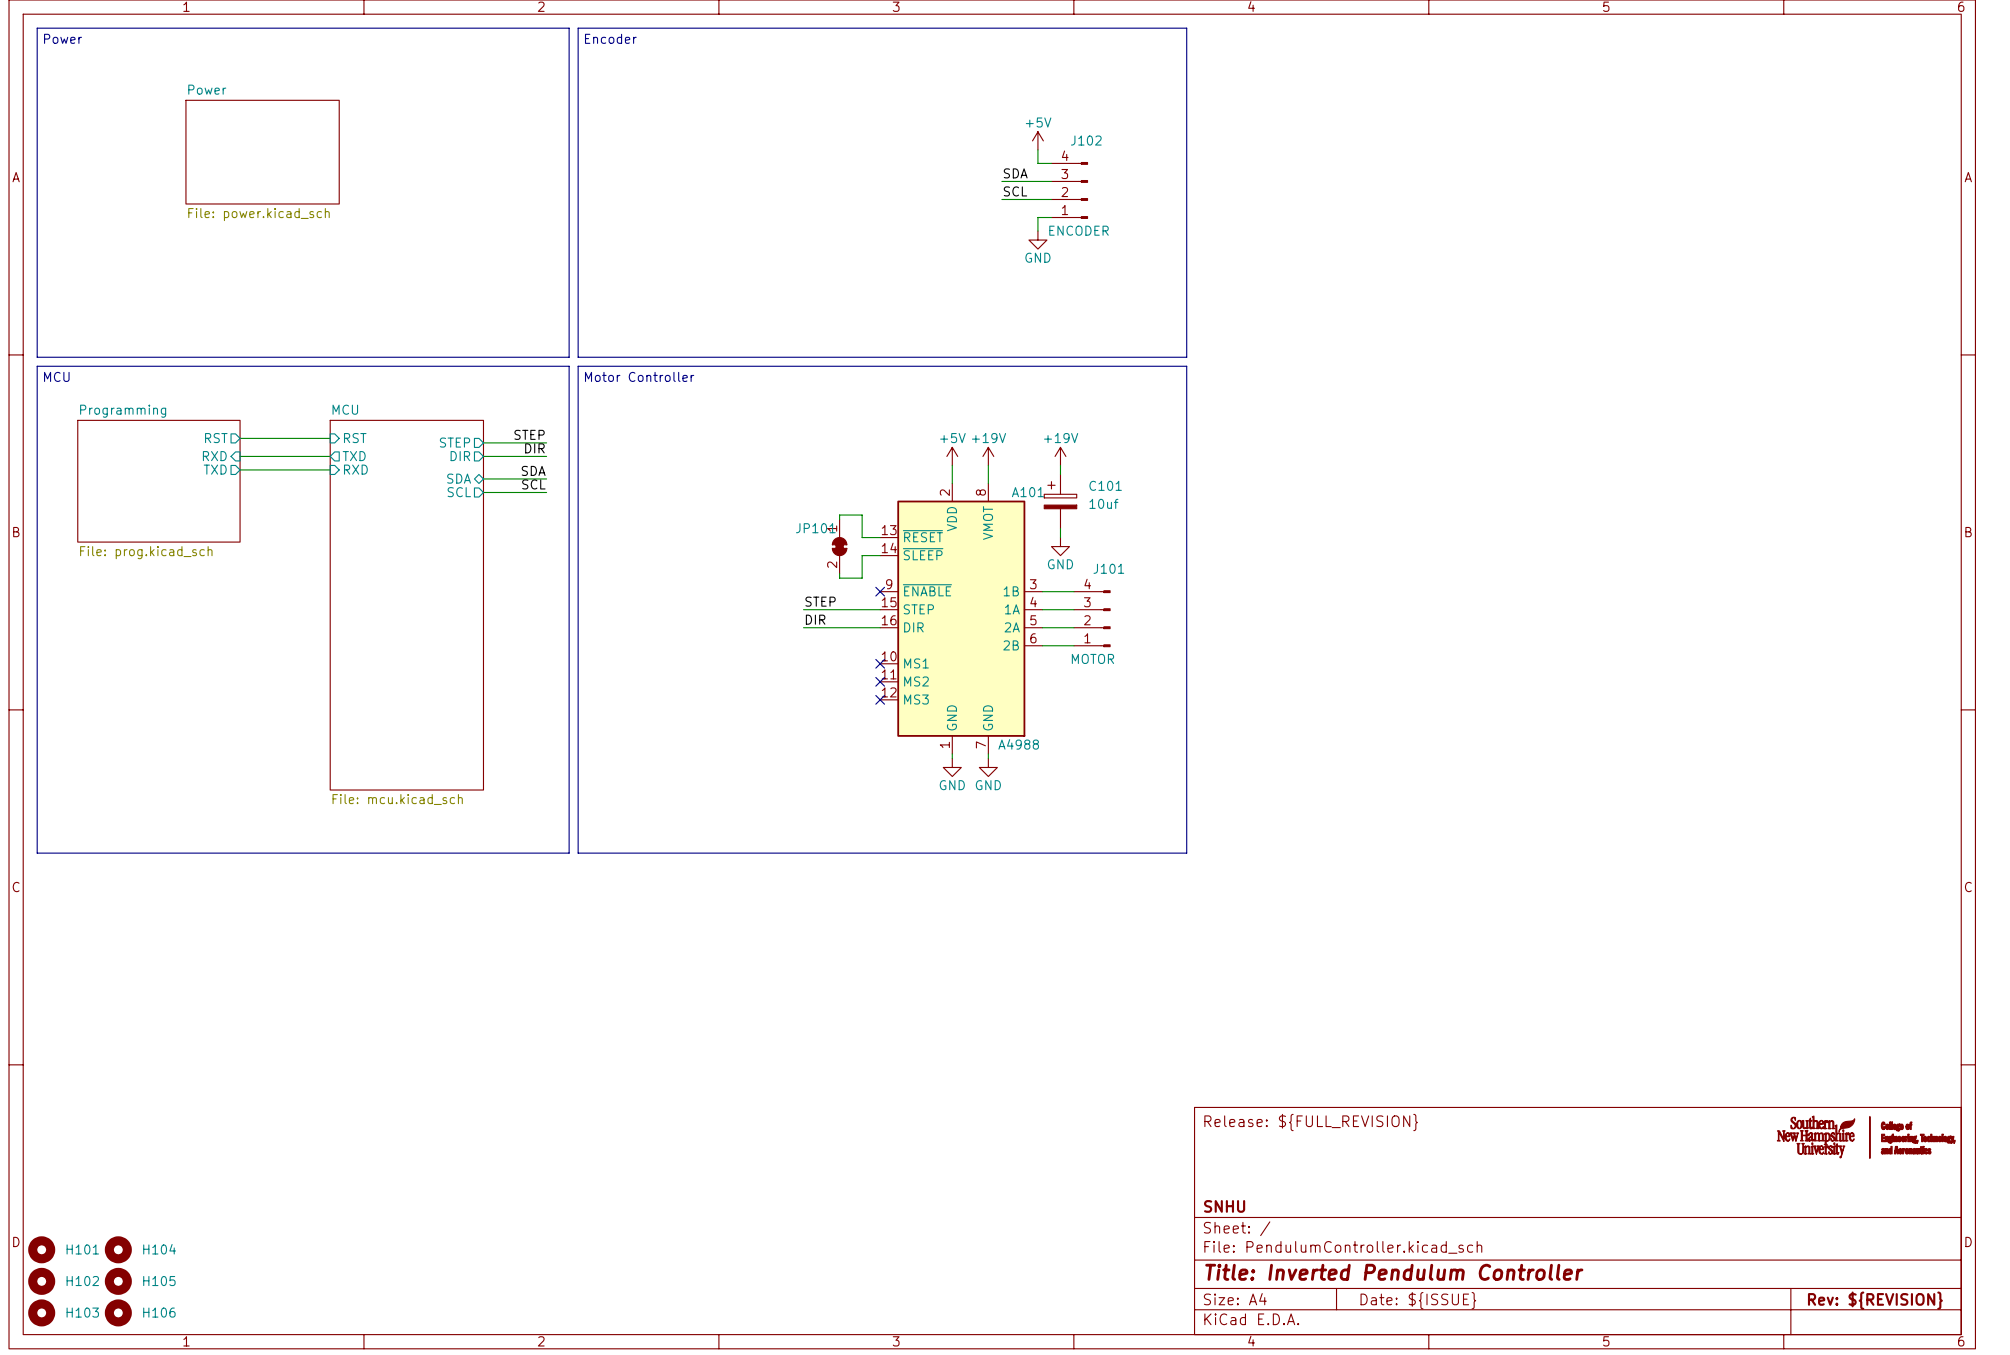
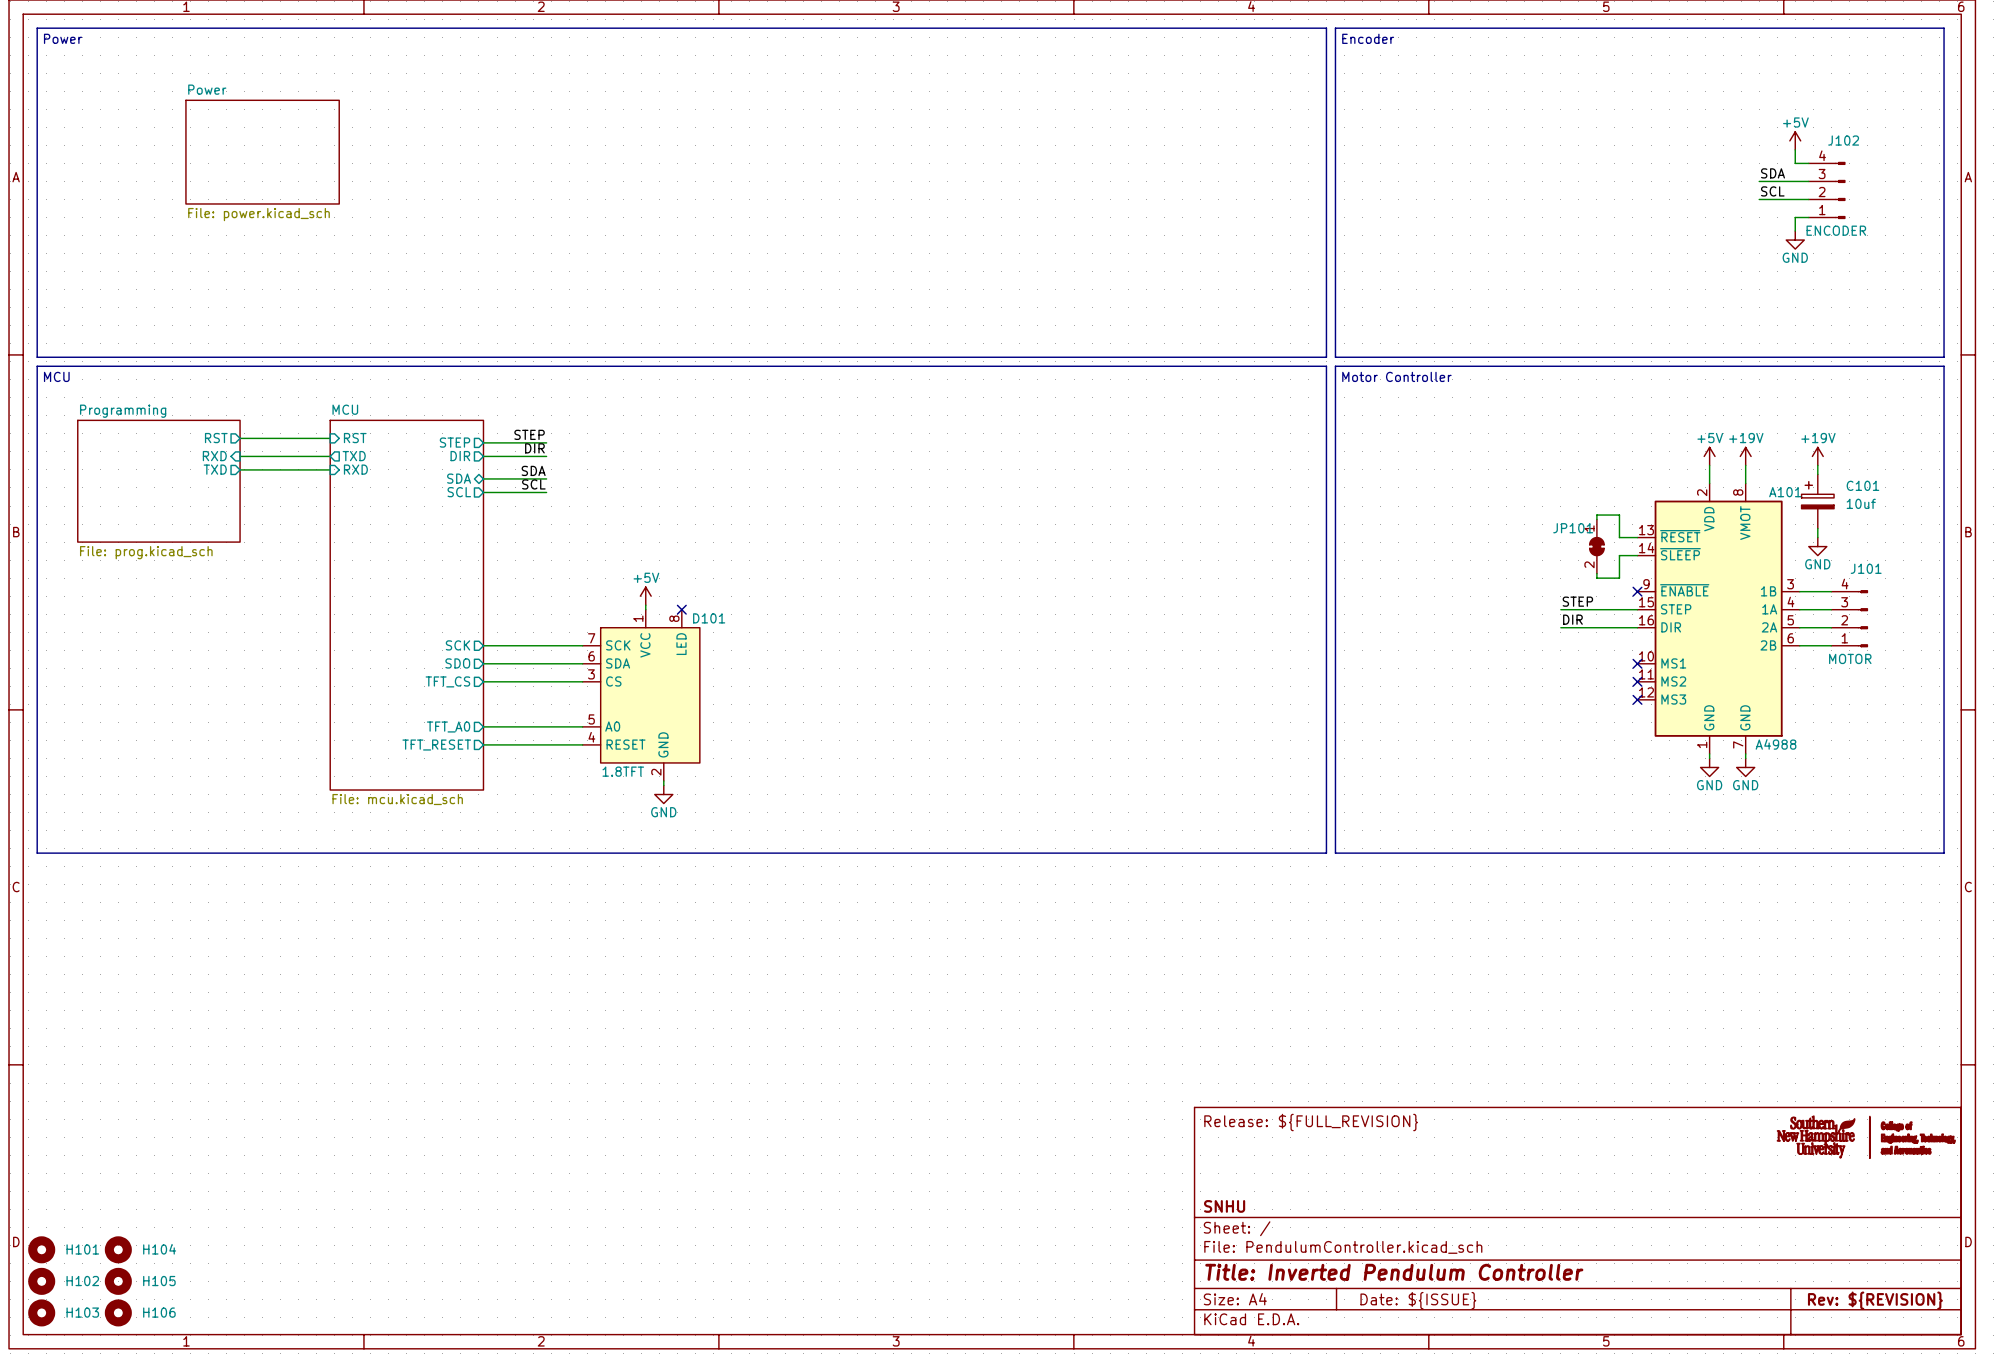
line: (569, 28) (569, 357) -> (569, 28) (578, 28)
line: (578, 28) (578, 357) -> (569, 357) (578, 357)
line: (1186, 28) (1186, 357) -> (1186, 28) (1326, 28) (1326, 357) (1186, 357)
line: none -> (1335, 28) (1944, 28) (1944, 357) (1335, 357) (1335, 28)
text: Encoder (610, 38) -> none
text: none -> Encoder (1368, 38)
power symbol: +5V (1037, 140) -> none
power symbol: none -> +5V (1795, 140)
wire: (1037, 149) (1037, 163) (1051, 163) -> none
wire: none -> (1795, 149) (1795, 163) (1808, 163)
label: SDA (1015, 173) -> none
label: none -> SDA (1773, 173)
wire: (1001, 181) (1051, 181) -> none
wire: none -> (1759, 181) (1808, 181)
J102 position: (1069, 190) -> (1827, 190)
label: SCL (1015, 191) -> none
label: none -> SCL (1772, 191)
wire: (1001, 199) (1051, 199) -> none
wire: none -> (1759, 199) (1808, 199)
wire: (1051, 217) (1037, 217) (1037, 231) -> none
wire: none -> (1808, 217) (1795, 217) (1795, 231)
power symbol: GND (1037, 240) -> none
power symbol: none -> GND (1795, 240)
line: (569, 366) (569, 853) -> (569, 366) (578, 366)
line: (578, 366) (578, 853) -> (569, 853) (578, 853)
line: (1186, 366) (1186, 853) -> (1186, 366) (1326, 366) (1326, 853) (1186, 853)
line: none -> (1335, 366) (1944, 366) (1944, 853) (1335, 853) (1335, 366)
text: Motor Controller (639, 376) -> none
text: none -> Motor Controller (1396, 376)
power symbol: +5V (952, 456) -> none
power symbol: +19V (988, 456) -> none
power symbol: +19V (1060, 456) -> none
power symbol: none -> +5V (1709, 456)
power symbol: none -> +19V (1745, 456)
power symbol: none -> +19V (1817, 456)
wire: (952, 465) (952, 483) -> none
wire: (988, 465) (988, 483) -> none
wire: (1060, 465) (1060, 474) -> none
wire: none -> (1709, 465) (1709, 483)
wire: none -> (1745, 465) (1745, 483)
wire: none -> (1817, 465) (1817, 474)
C101 position: (1060, 501) -> (1817, 501)
wire: (839, 519) (839, 515) (862, 515) (862, 537) (880, 537) -> none
wire: none -> (1596, 519) (1596, 515) (1619, 515) (1619, 537) (1637, 537)
wire: (1060, 528) (1060, 537) -> none
wire: none -> (1817, 528) (1817, 537)
JP101 position: (839, 546) -> (1596, 546)
power symbol: GND (1060, 546) -> none
power symbol: none -> GND (1817, 546)
wire: (880, 555) (862, 555) (862, 578) (839, 578) (839, 573) -> none
wire: none -> (1637, 555) (1619, 555) (1619, 578) (1596, 578) (1596, 573)
no-connect mark: (880, 591) -> none
wire: (1042, 591) (1074, 591) -> none
no-connect mark: none -> (1637, 591)
wire: none -> (1799, 591) (1831, 591)
power symbol: none -> +5V (645, 596)
label: STEP (820, 601) -> none
label: none -> STEP (1577, 601)
wire: none -> (645, 605) (645, 609)
no-connect mark: none -> (681, 609)
wire: (803, 609) (880, 609) -> none
wire: (1042, 609) (1074, 609) -> none
wire: none -> (1560, 609) (1637, 609)
wire: none -> (1799, 609) (1831, 609)
A101 position: (961, 618) -> (1718, 618)
J101 position: (1092, 618) -> (1849, 618)
label: DIR (815, 619) -> none
label: none -> DIR (1572, 619)
wire: (803, 627) (880, 627) -> none
wire: (1042, 627) (1074, 627) -> none
wire: none -> (1560, 627) (1637, 627)
wire: none -> (1799, 627) (1831, 627)
sheet pin: none -> SCK (458, 645)
wire: none -> (483, 645) (582, 645)
wire: (1042, 645) (1074, 645) -> none
wire: none -> (1799, 645) (1831, 645)
sheet pin: none -> SDO (457, 663)
wire: none -> (483, 663) (582, 663)
no-connect mark: (880, 663) -> none
no-connect mark: none -> (1637, 663)
sheet pin: none -> TFT_CS (447, 681)
wire: none -> (483, 681) (582, 681)
no-connect mark: (880, 681) -> none
no-connect mark: none -> (1637, 681)
D101: none -> 1.8TFT (641, 695)
no-connect mark: (880, 699) -> none
no-connect mark: none -> (1637, 699)
sheet pin: none -> TFT_A0 (448, 726)
wire: none -> (483, 726) (582, 726)
wire: none -> (483, 744) (582, 744)
sheet pin: none -> TFT_RESET (436, 745)
wire: (952, 753) (952, 758) -> none
wire: (988, 753) (988, 758) -> none
wire: none -> (1709, 753) (1709, 758)
wire: none -> (1745, 753) (1745, 758)
power symbol: GND (952, 767) -> none
power symbol: GND (988, 767) -> none
power symbol: none -> GND (1709, 767)
power symbol: none -> GND (1745, 767)
wire: none -> (663, 780) (663, 785)
power symbol: none -> GND (663, 794)

